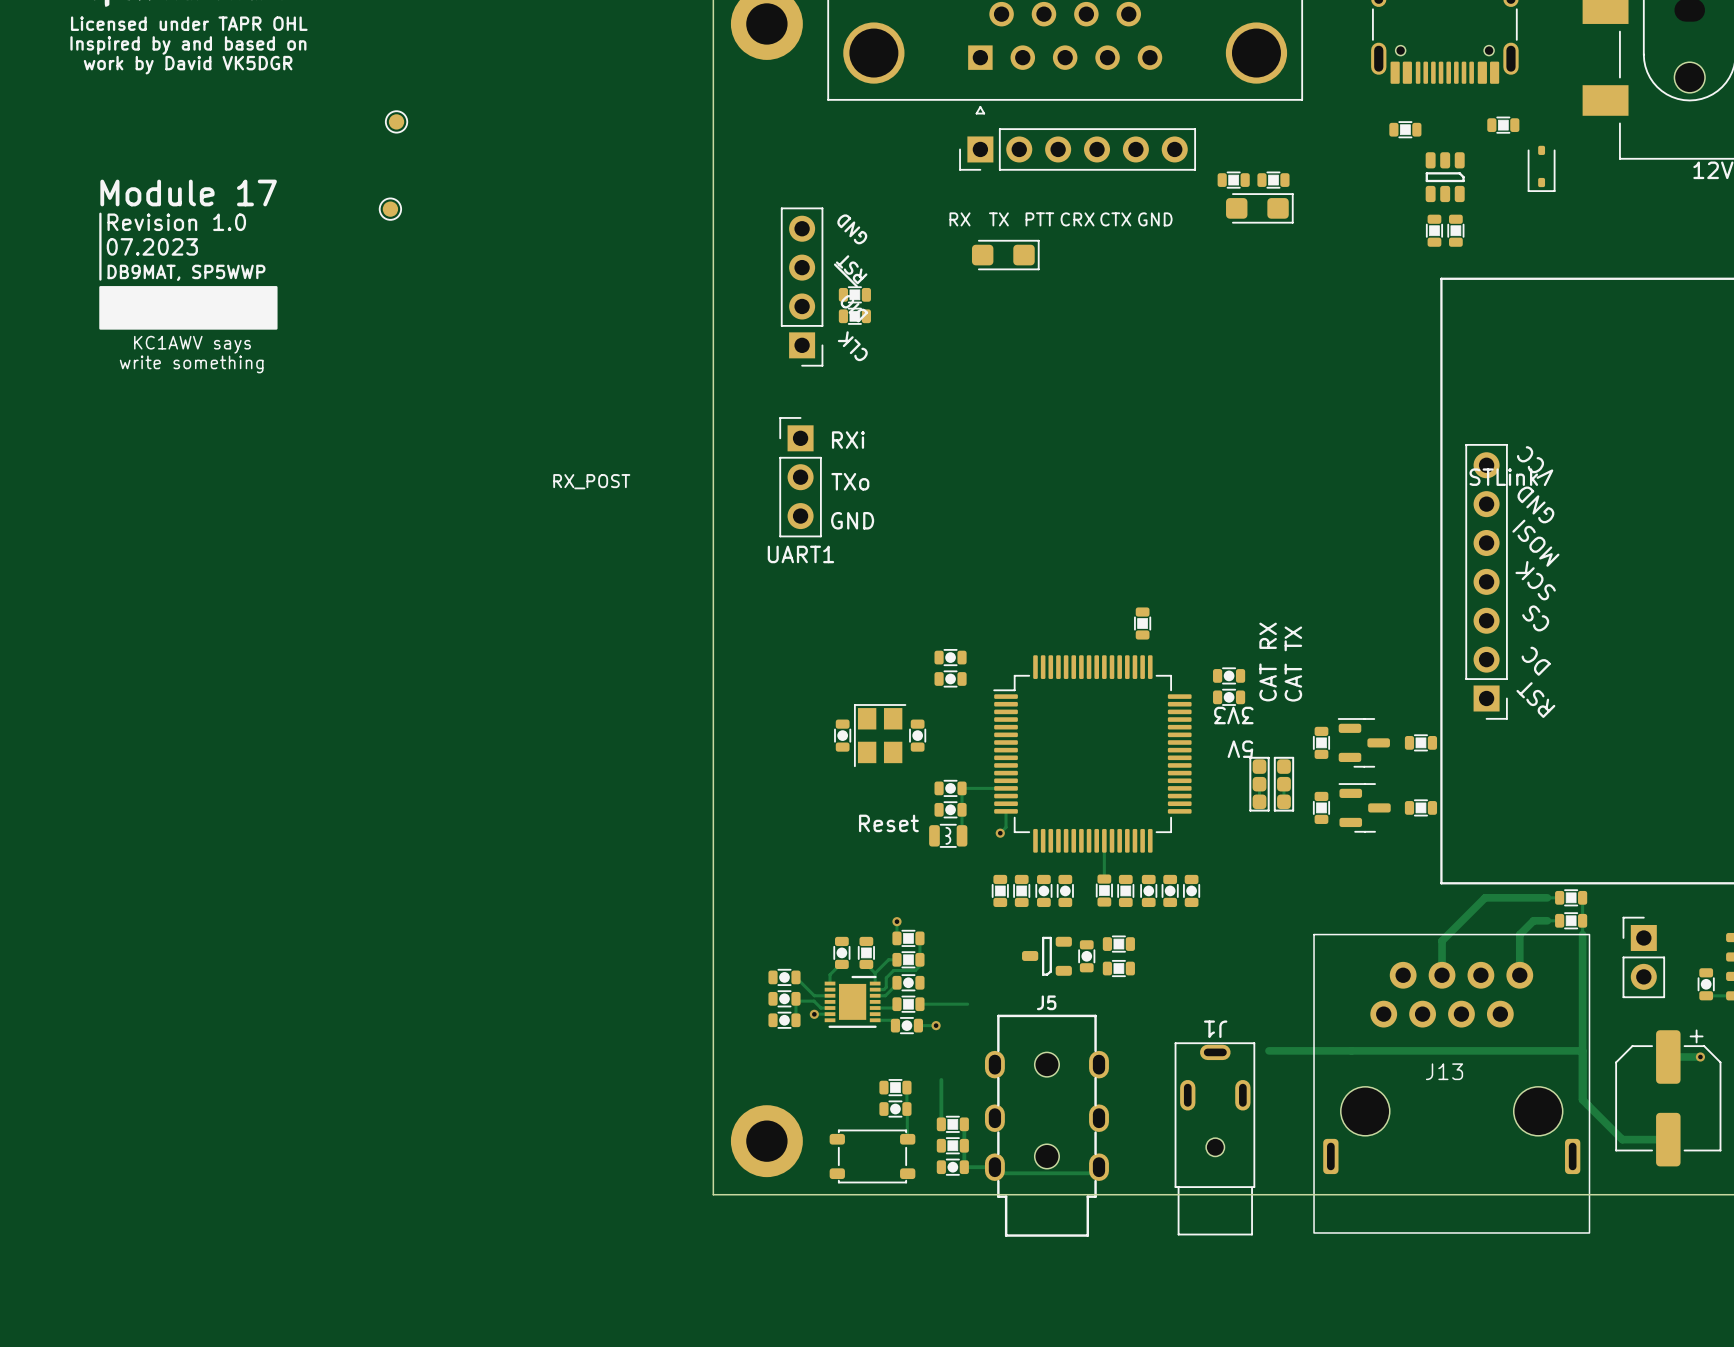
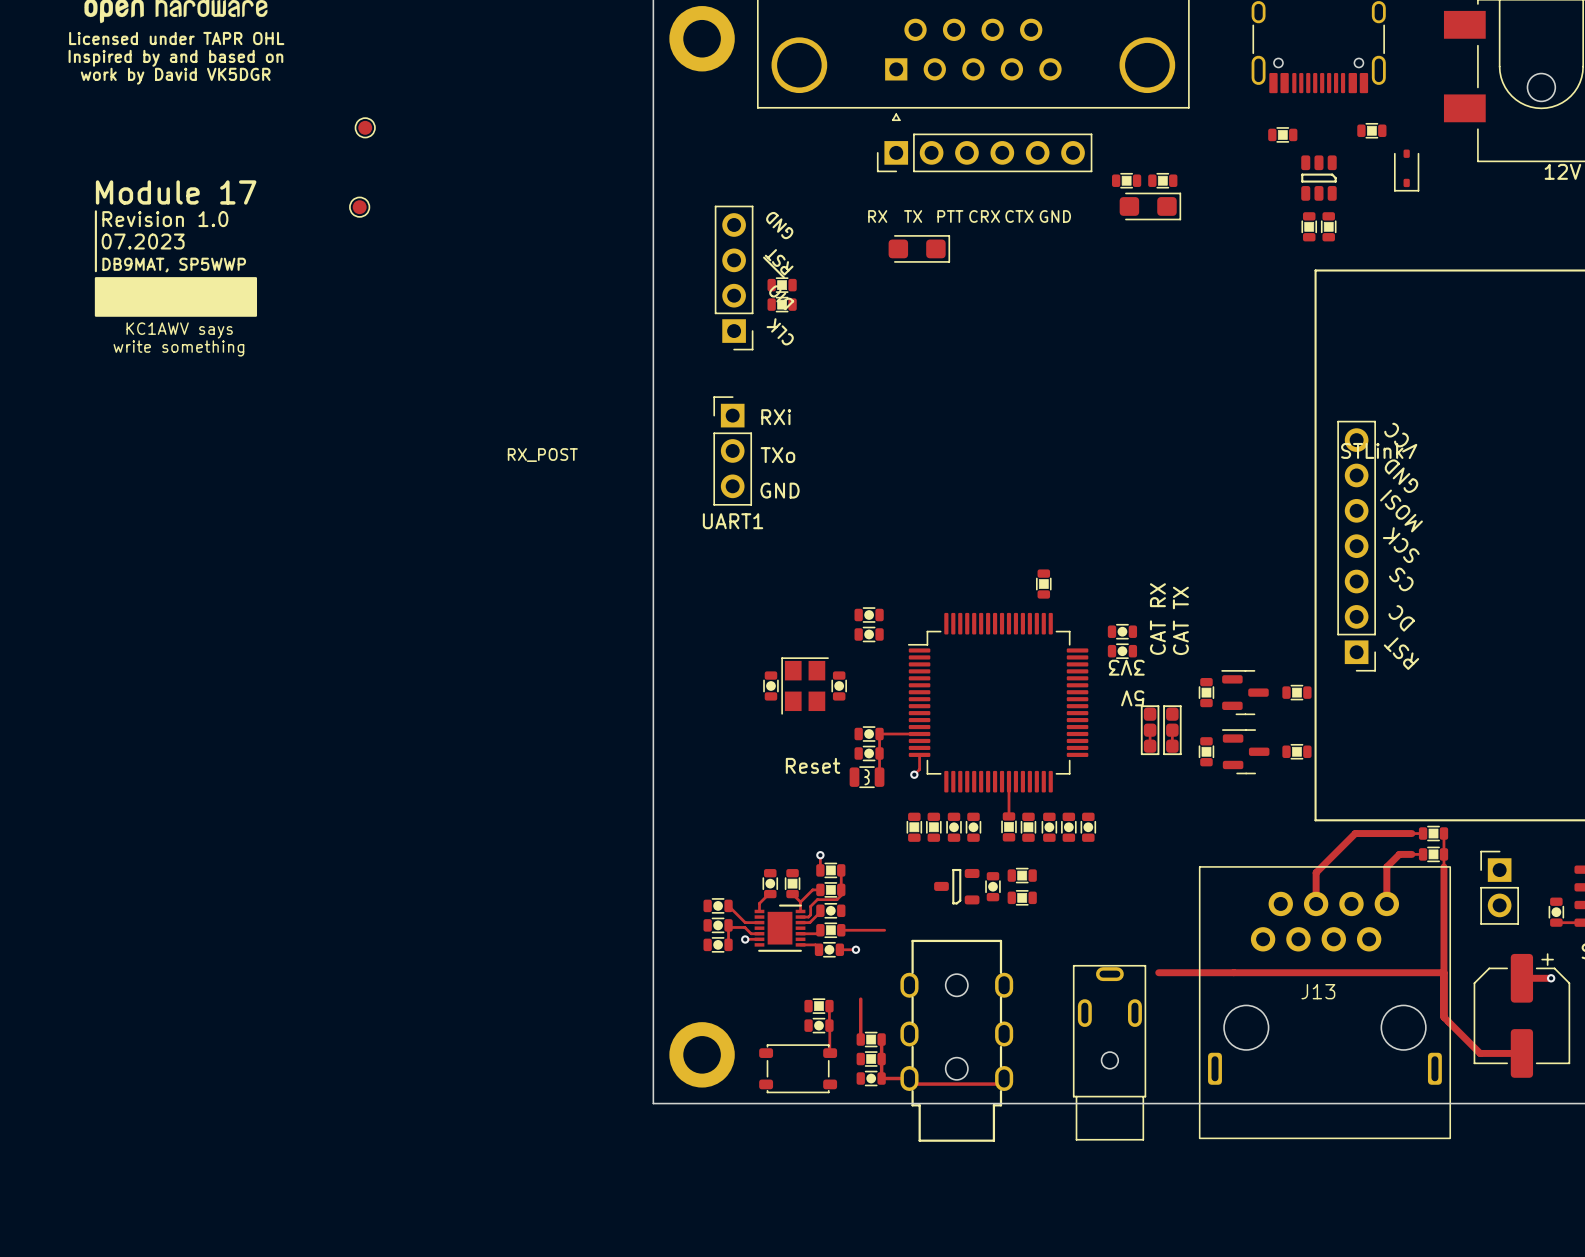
J5 name: J5 (1046, 1002) -> none
J1 name: J1 (1215, 1029) -> none

